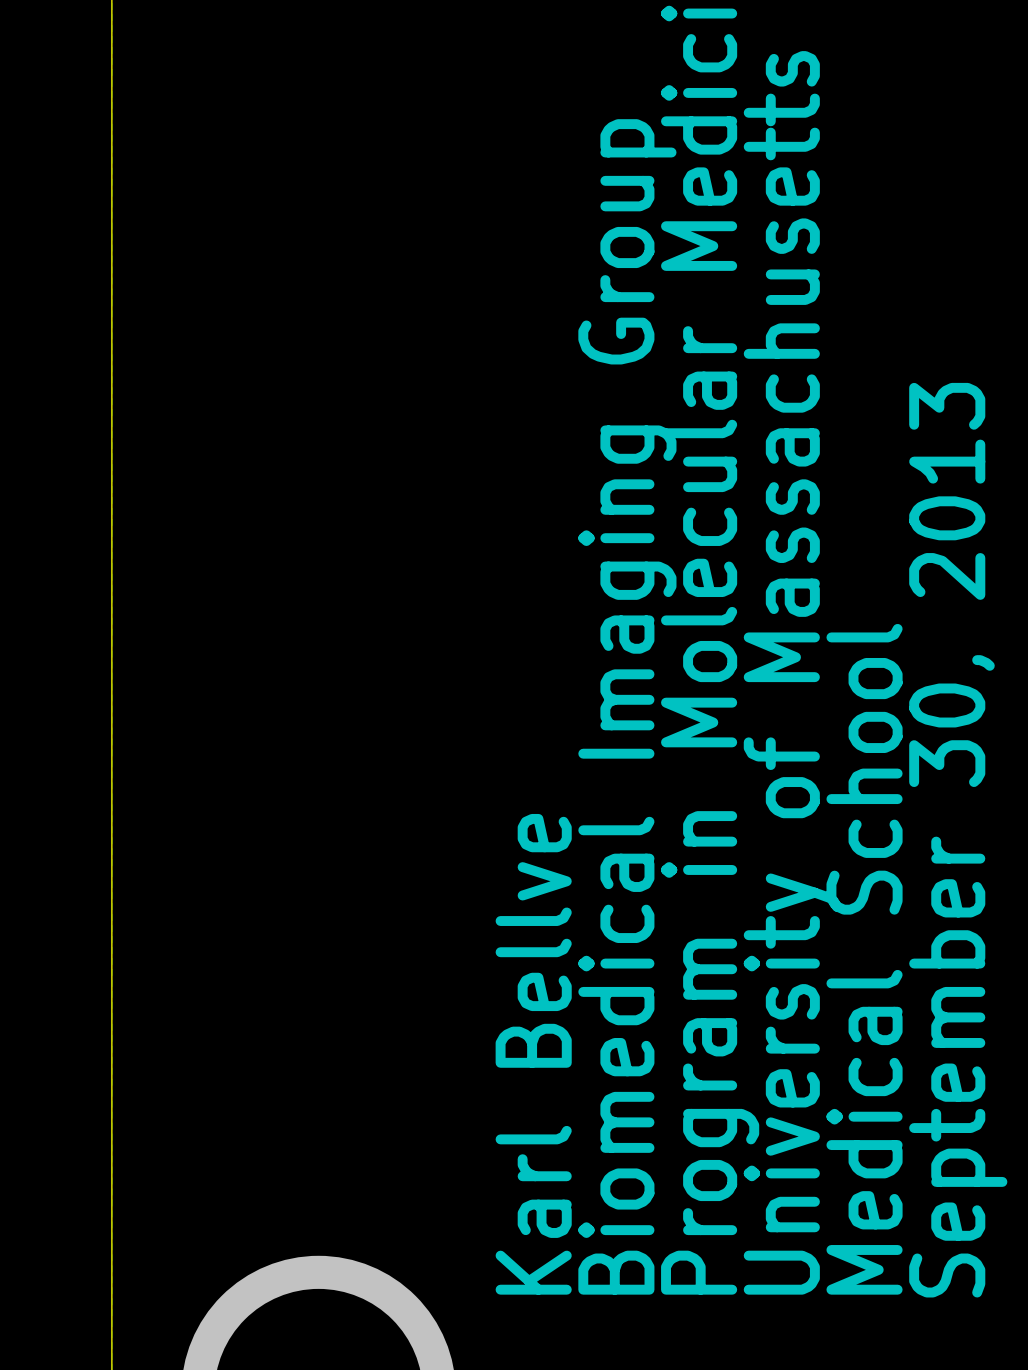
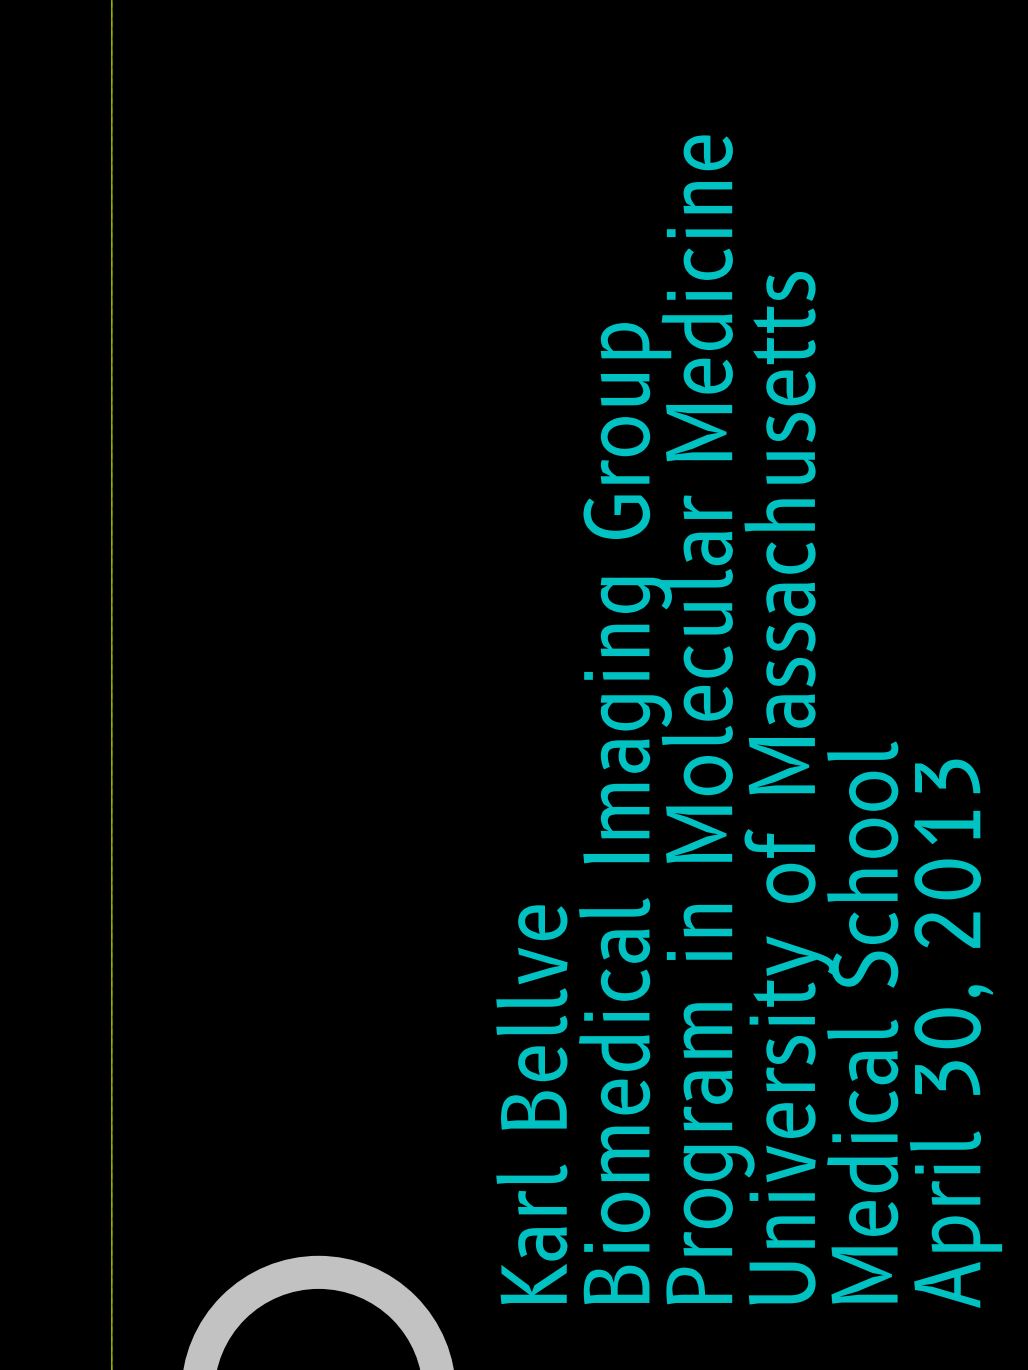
text: September 30, 2013 (958, 840) -> April 30, 2013 (955, 1033)

